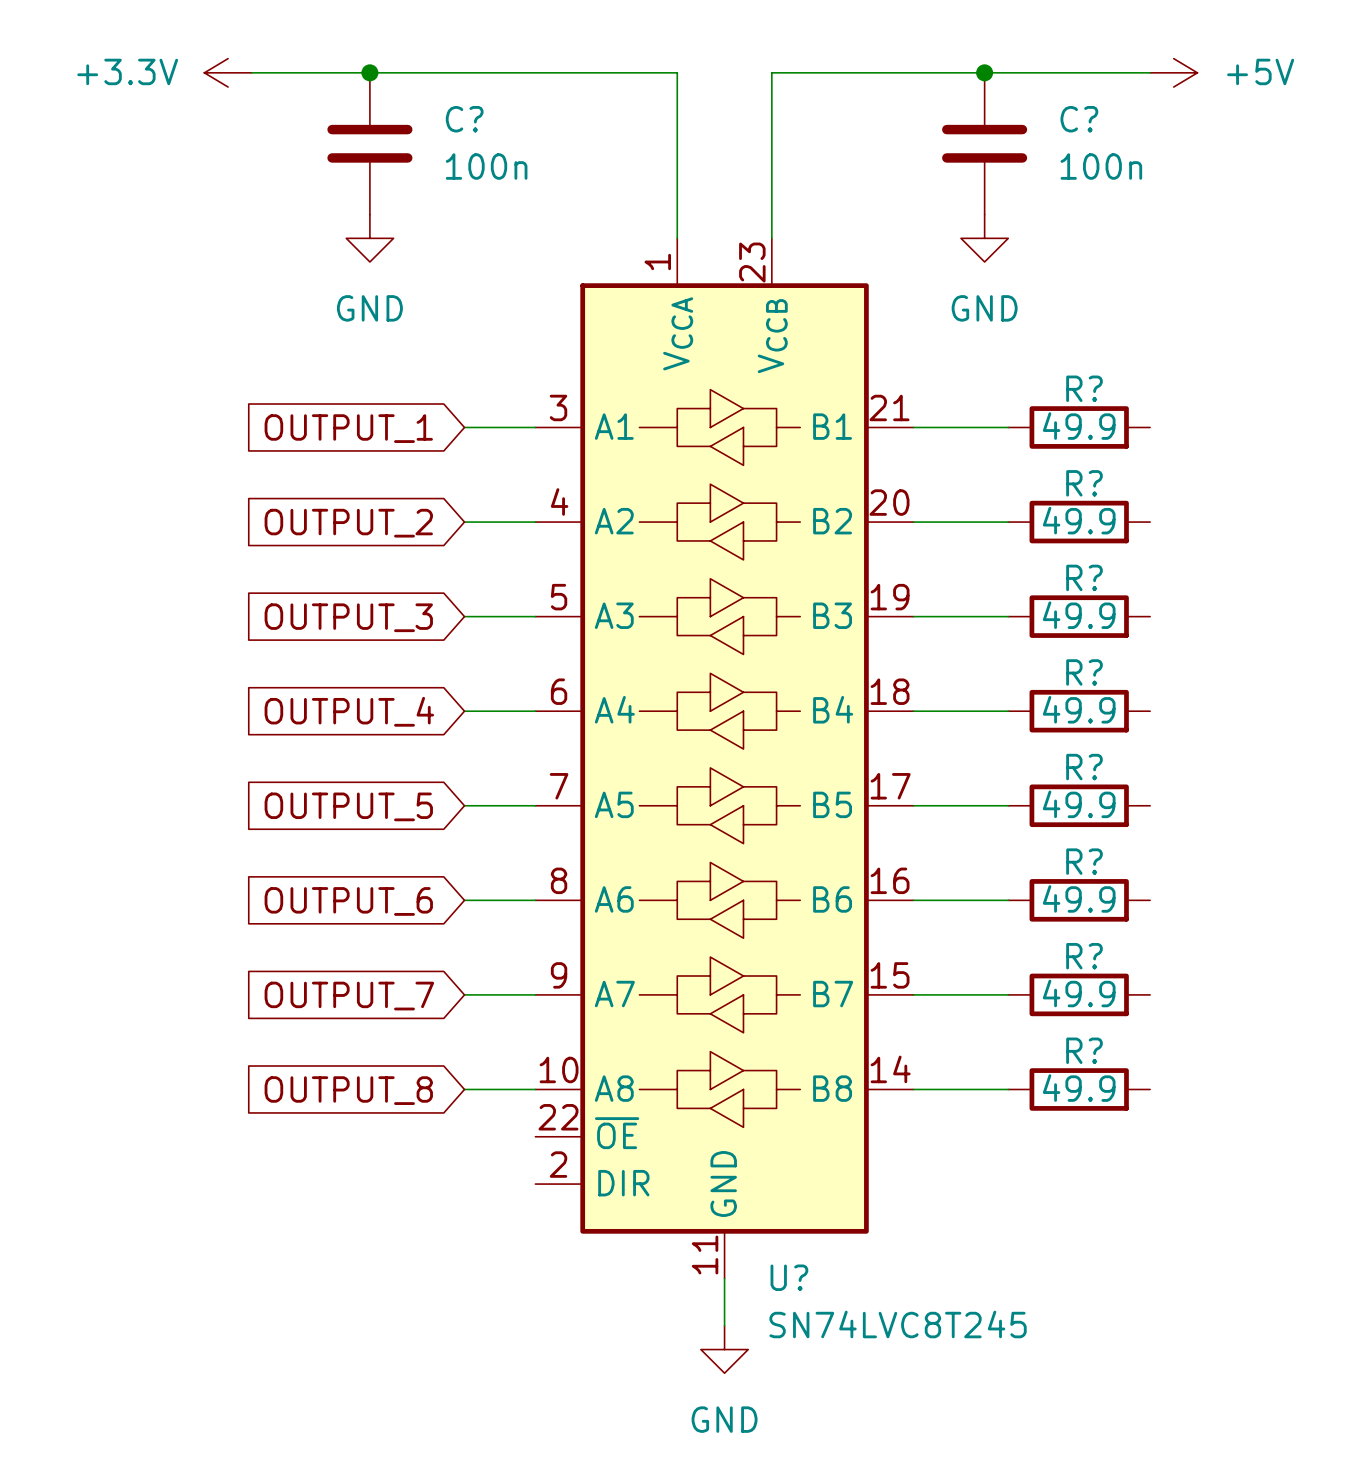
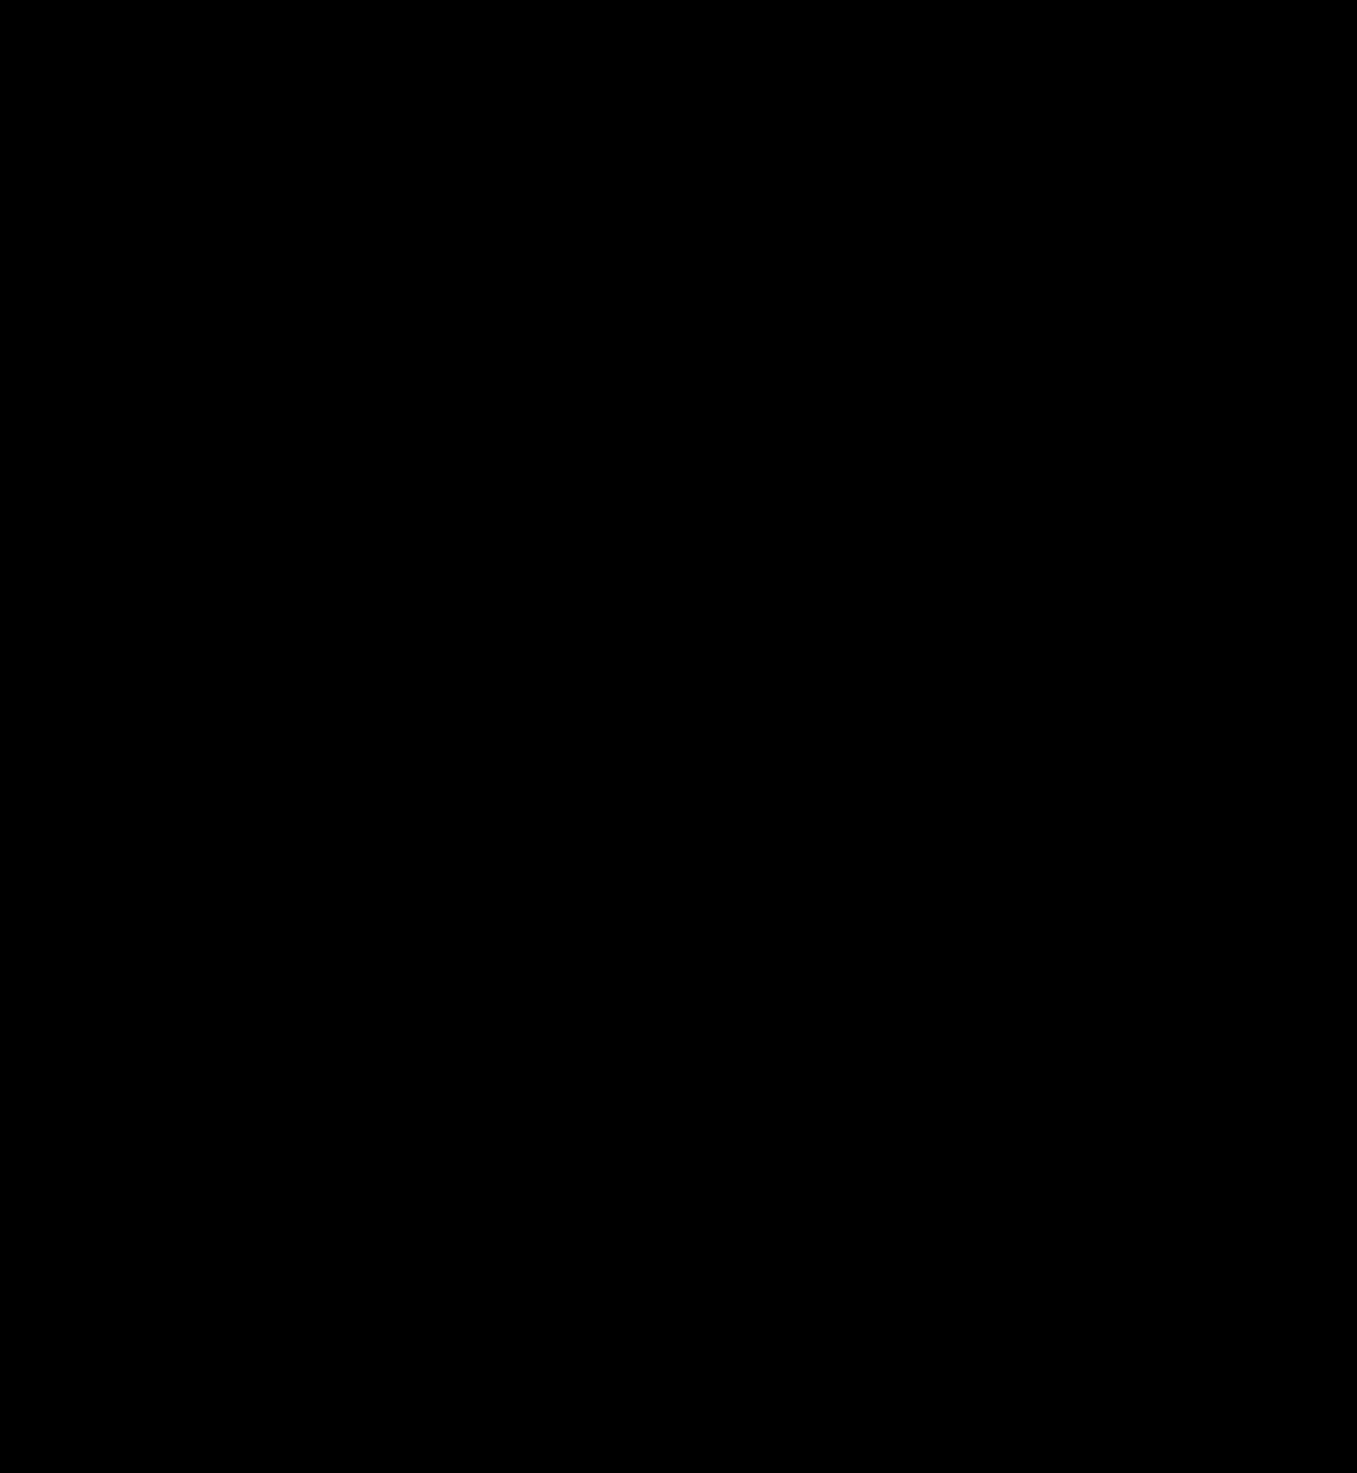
power symbol: +3.3V (228, 72) -> none
wire: (251, 72) (677, 72) (677, 238) -> none
junction: (369, 72) -> none
junction: (984, 72) -> none
wire: (1150, 72) (771, 72) (771, 238) -> none
power symbol: +5V (1173, 72) -> none
C?: 100n (369, 143) -> none
C?: 100n (984, 143) -> none
power symbol: GND (369, 238) -> none
power symbol: GND (984, 238) -> none
wire: (464, 427) (535, 427) -> none
wire: (913, 427) (1008, 427) -> none
R?: 49.9 (1079, 427) -> none
global label: OUTPUT_1 (348, 428) -> none
wire: (464, 522) (535, 522) -> none
wire: (913, 522) (1008, 522) -> none
R?: 49.9 (1079, 522) -> none
global label: OUTPUT_2 (348, 523) -> none
wire: (464, 616) (535, 616) -> none
wire: (913, 616) (1008, 616) -> none
R?: 49.9 (1079, 616) -> none
global label: OUTPUT_3 (348, 617) -> none
global label: OUTPUT_4 (349, 711) -> none
wire: (464, 711) (535, 711) -> none
wire: (913, 711) (1008, 711) -> none
R?: 49.9 (1079, 711) -> none
U?: SN74LVC8T245 (724, 758) -> none
wire: (464, 805) (535, 805) -> none
wire: (913, 805) (1008, 805) -> none
R?: 49.9 (1079, 805) -> none
global label: OUTPUT_5 (348, 806) -> none
wire: (464, 900) (535, 900) -> none
wire: (913, 900) (1008, 900) -> none
R?: 49.9 (1079, 900) -> none
global label: OUTPUT_6 (348, 901) -> none
wire: (464, 994) (535, 994) -> none
wire: (913, 994) (1008, 994) -> none
R?: 49.9 (1079, 994) -> none
global label: OUTPUT_7 (349, 996) -> none
wire: (464, 1089) (535, 1089) -> none
wire: (913, 1089) (1008, 1089) -> none
R?: 49.9 (1079, 1089) -> none
global label: OUTPUT_8 (348, 1090) -> none
wire: (724, 1278) (724, 1325) -> none
power symbol: GND (724, 1349) -> none

